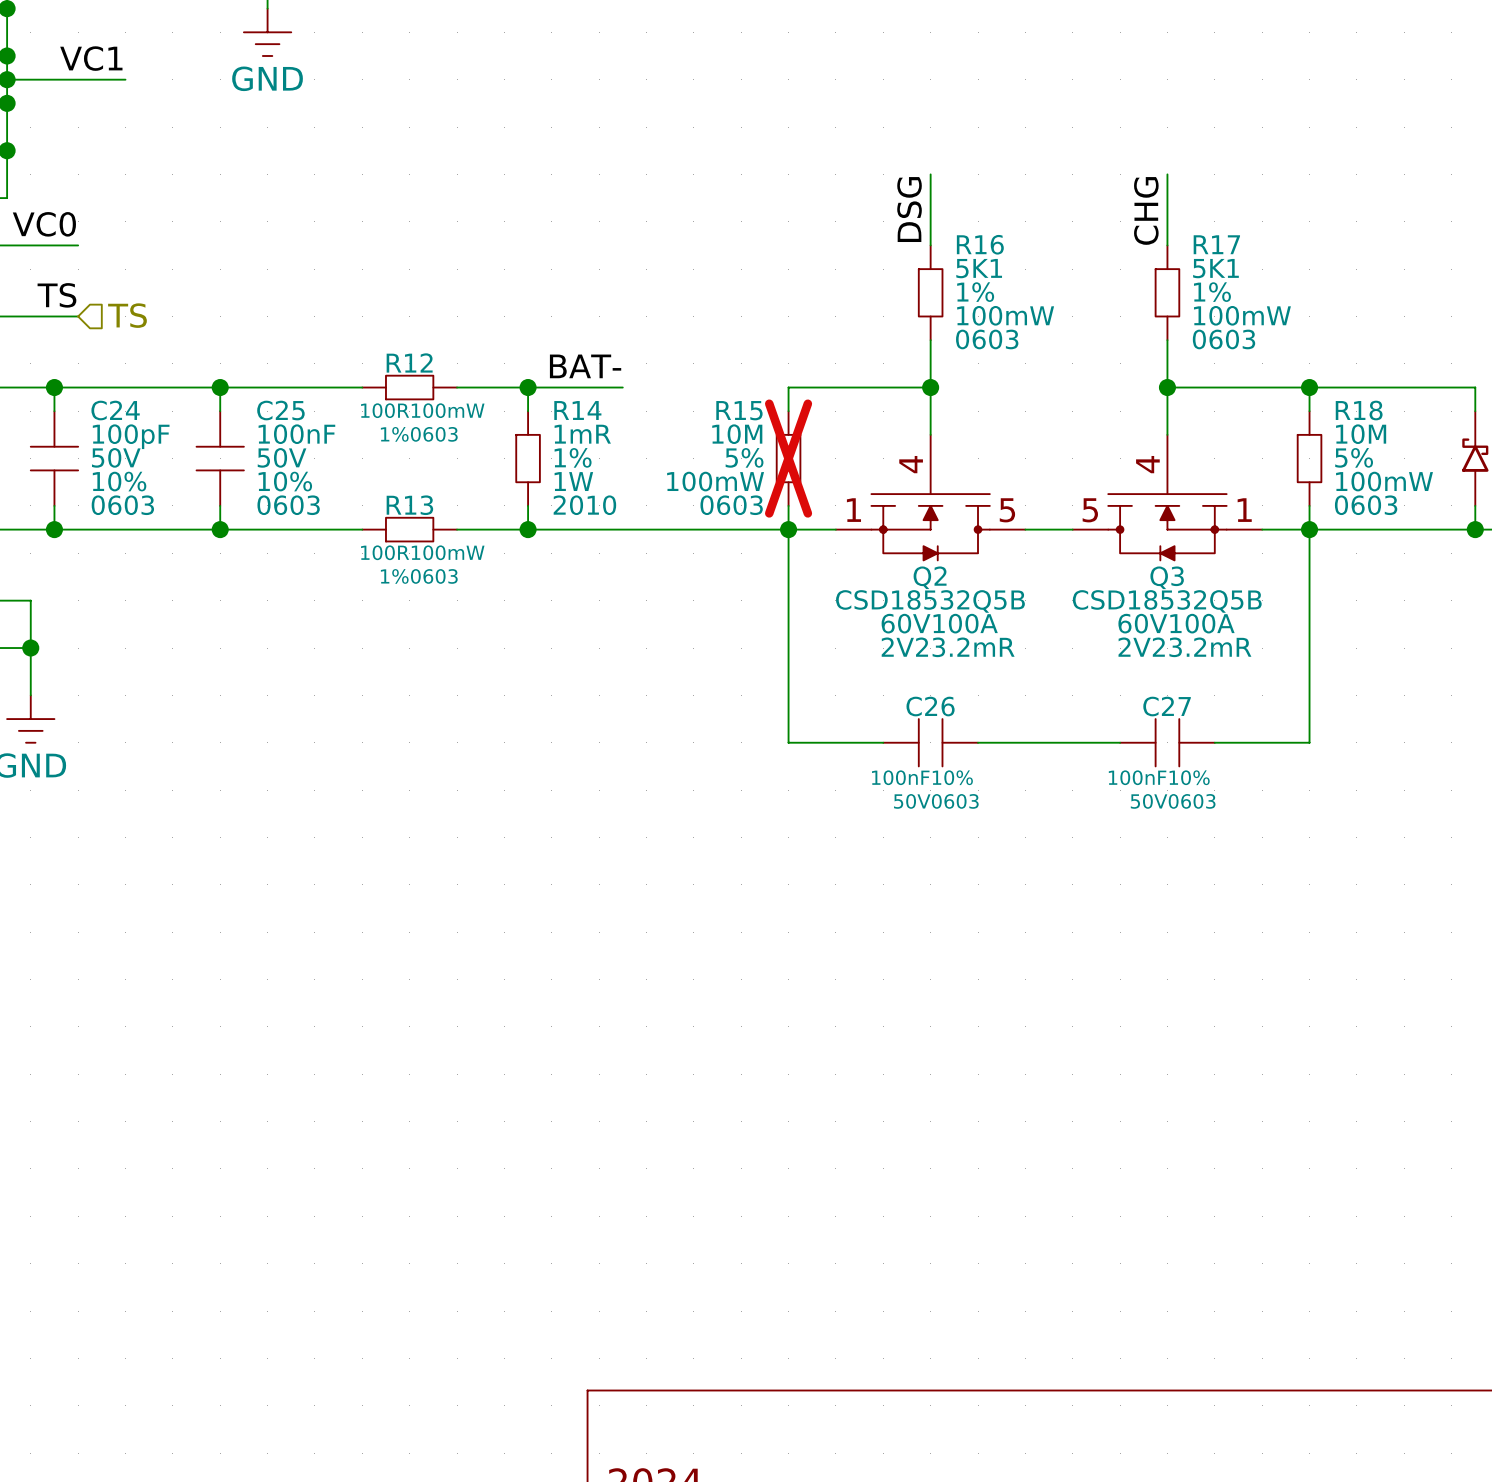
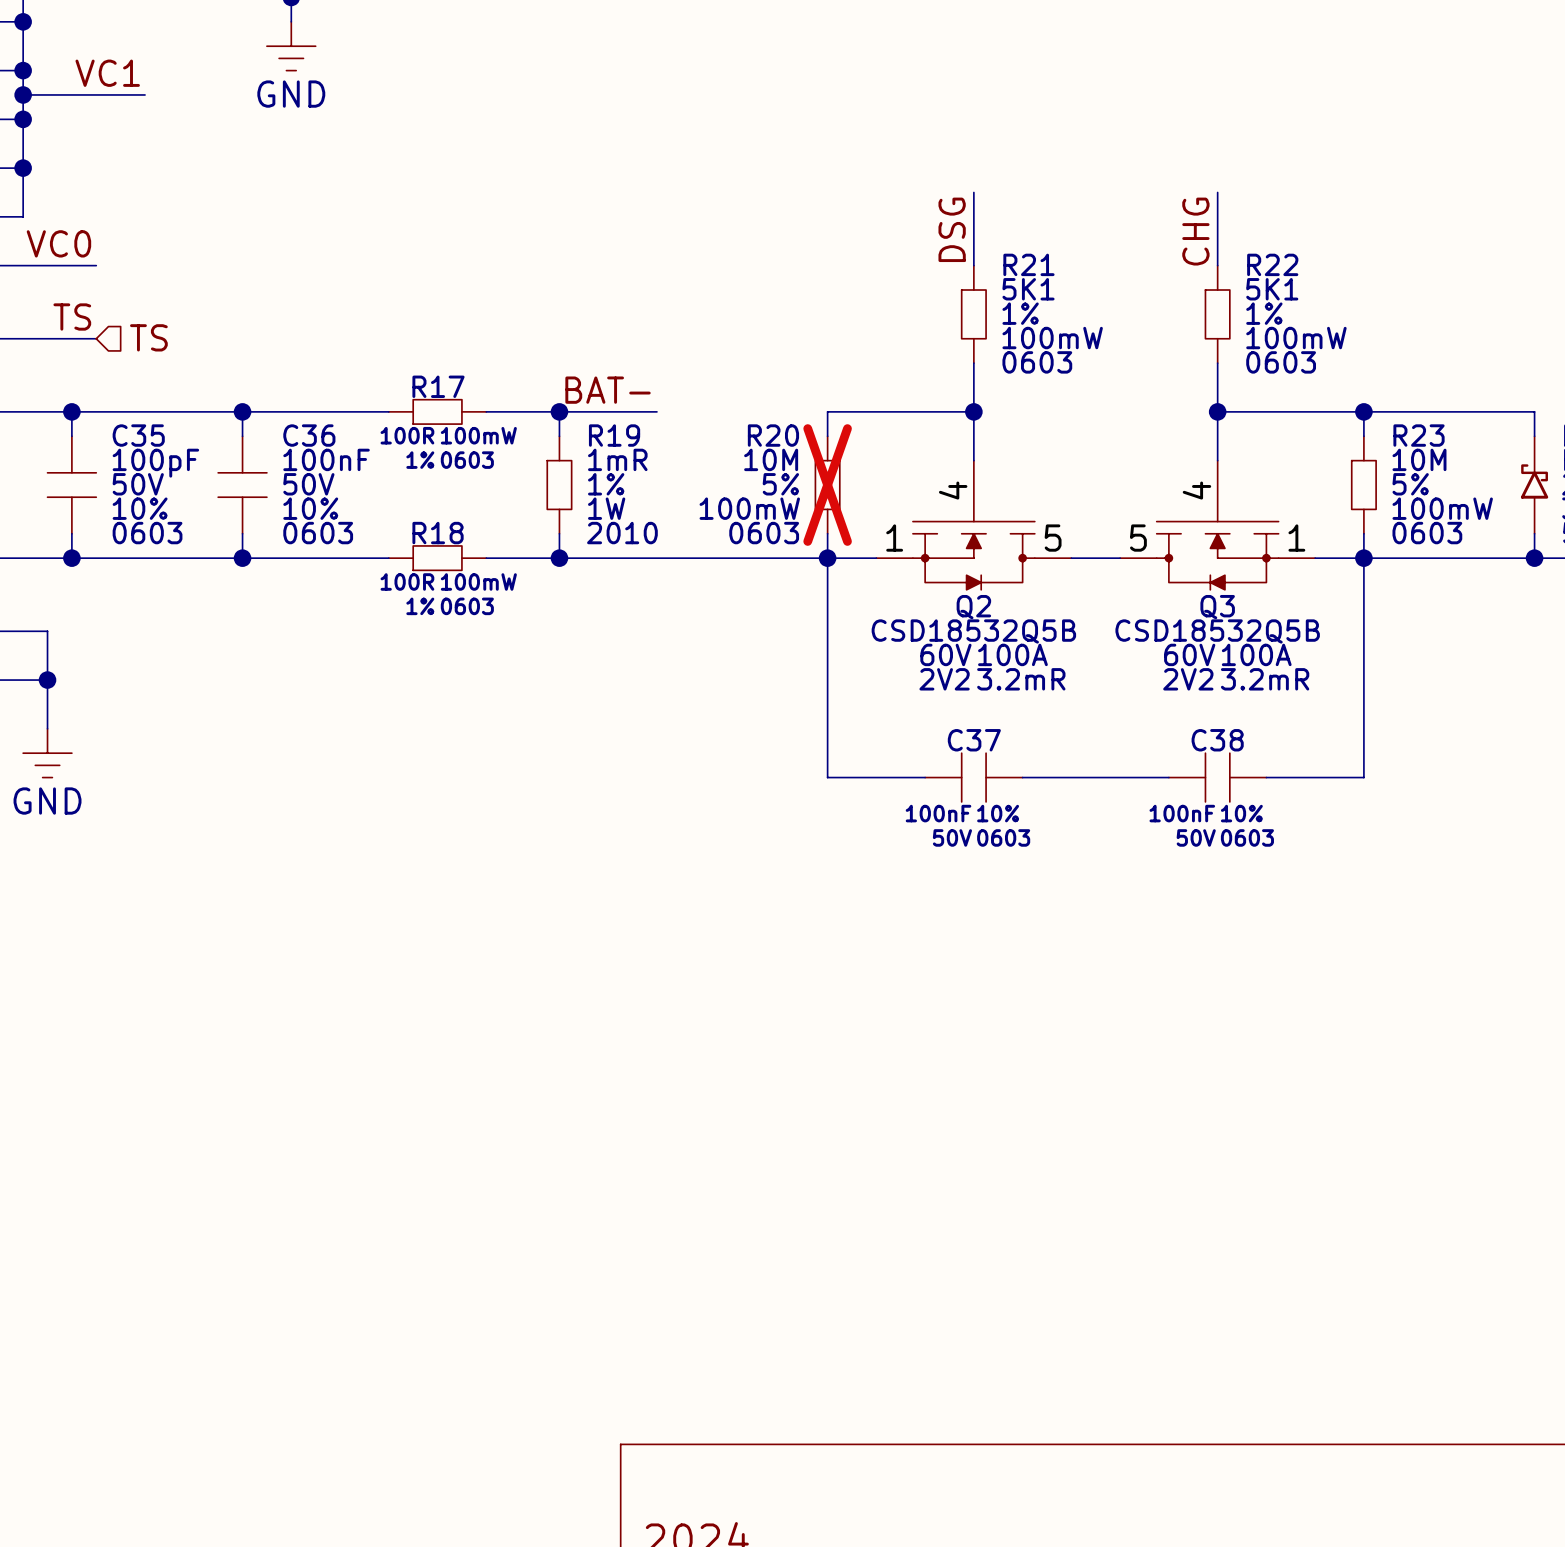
R16 name: R16 (980, 244) -> R21 (1028, 264)
R17 name: R17 (1216, 244) -> R22 (1272, 264)
R12 name: R12 (409, 362) -> R17 (438, 386)
C24 name: C24 (115, 410) -> C35 (138, 435)
C25 name: C25 (280, 410) -> C36 (309, 435)
R14 name: R14 (577, 410) -> R19 (614, 435)
R15 name: R15 (739, 410) -> R20 (773, 435)
R18 name: R18 (1359, 410) -> R23 (1419, 435)
R13 name: R13 (409, 505) -> R18 (438, 533)
C26 name: C26 (930, 706) -> C37 (974, 740)
C27 name: C27 (1167, 706) -> C38 (1217, 740)

